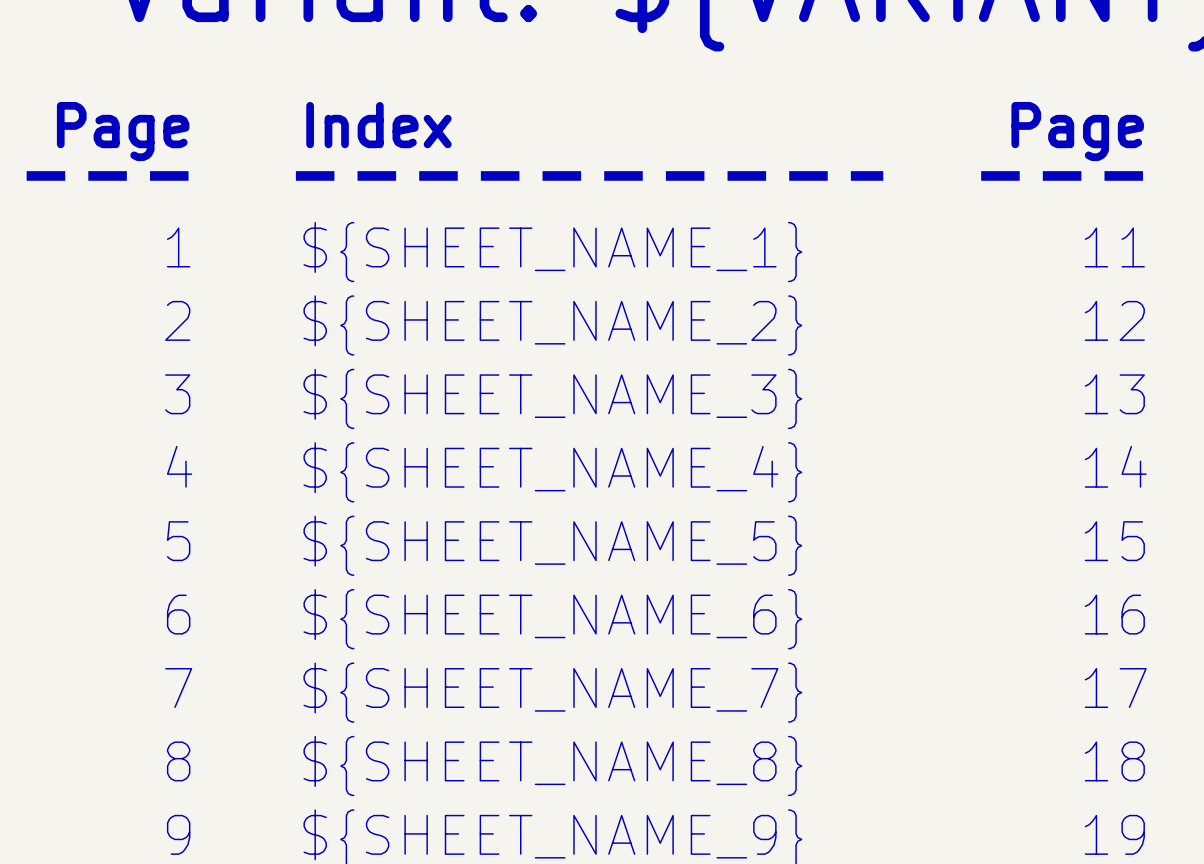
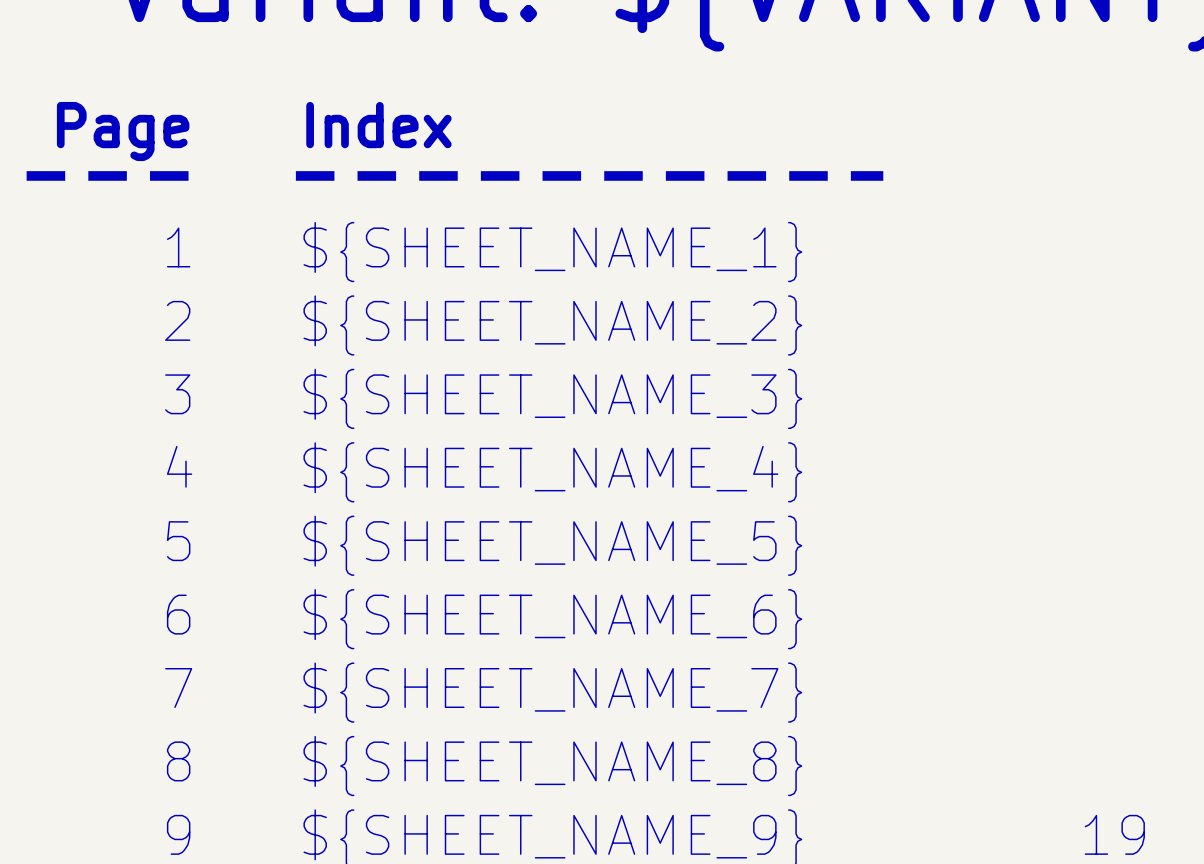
text: Page (1077, 131) -> none
line: (981, 175) (1152, 175) -> none
text: 11 (1114, 247) -> none
text: 12 (1114, 320) -> none
text: 13 (1114, 394) -> none
text: 14 (1115, 466) -> none
text: 15 (1114, 541) -> none
text: 16 (1114, 614) -> none
text: 17 (1115, 688) -> none
text: 18 (1114, 761) -> none

